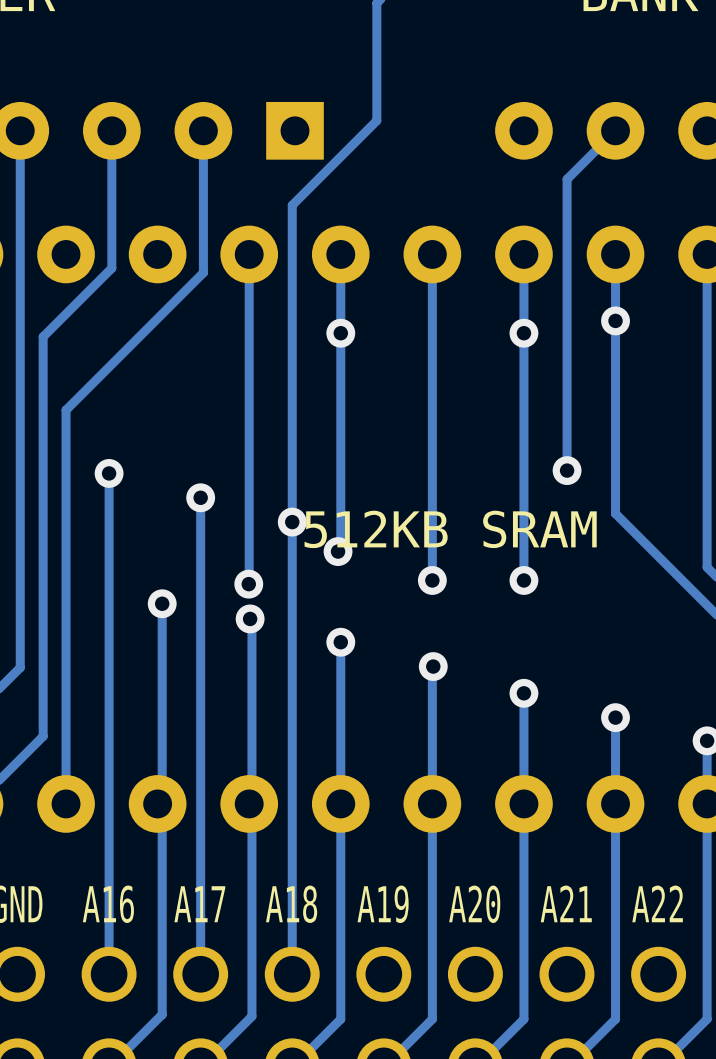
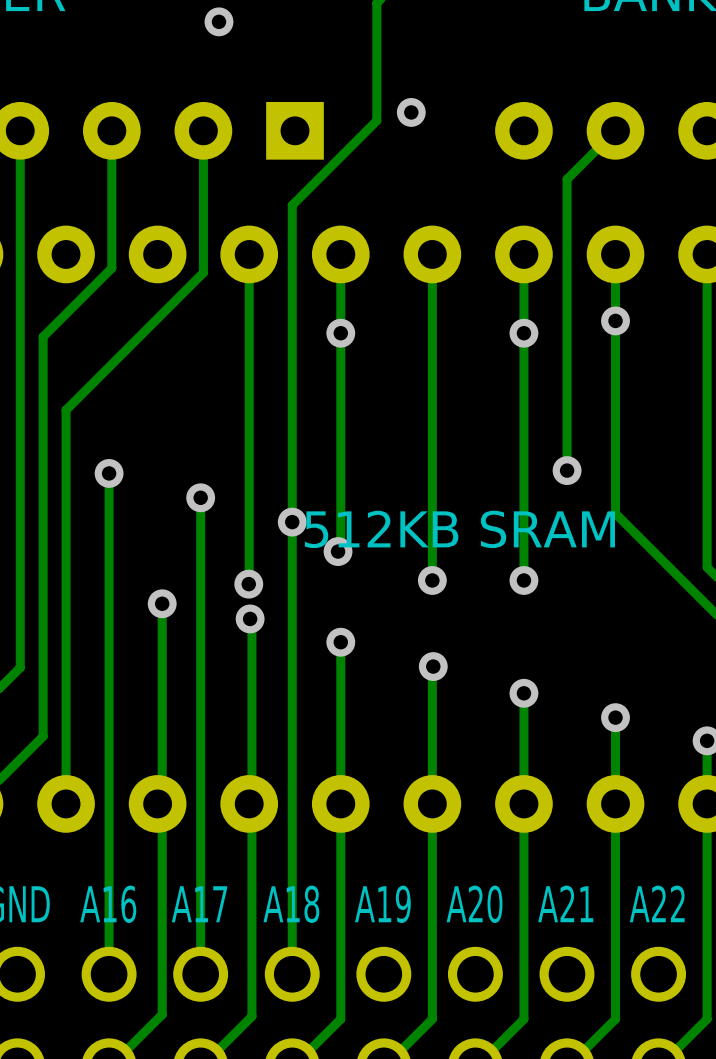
via: none -> (218, 21)
via: none -> (411, 112)

